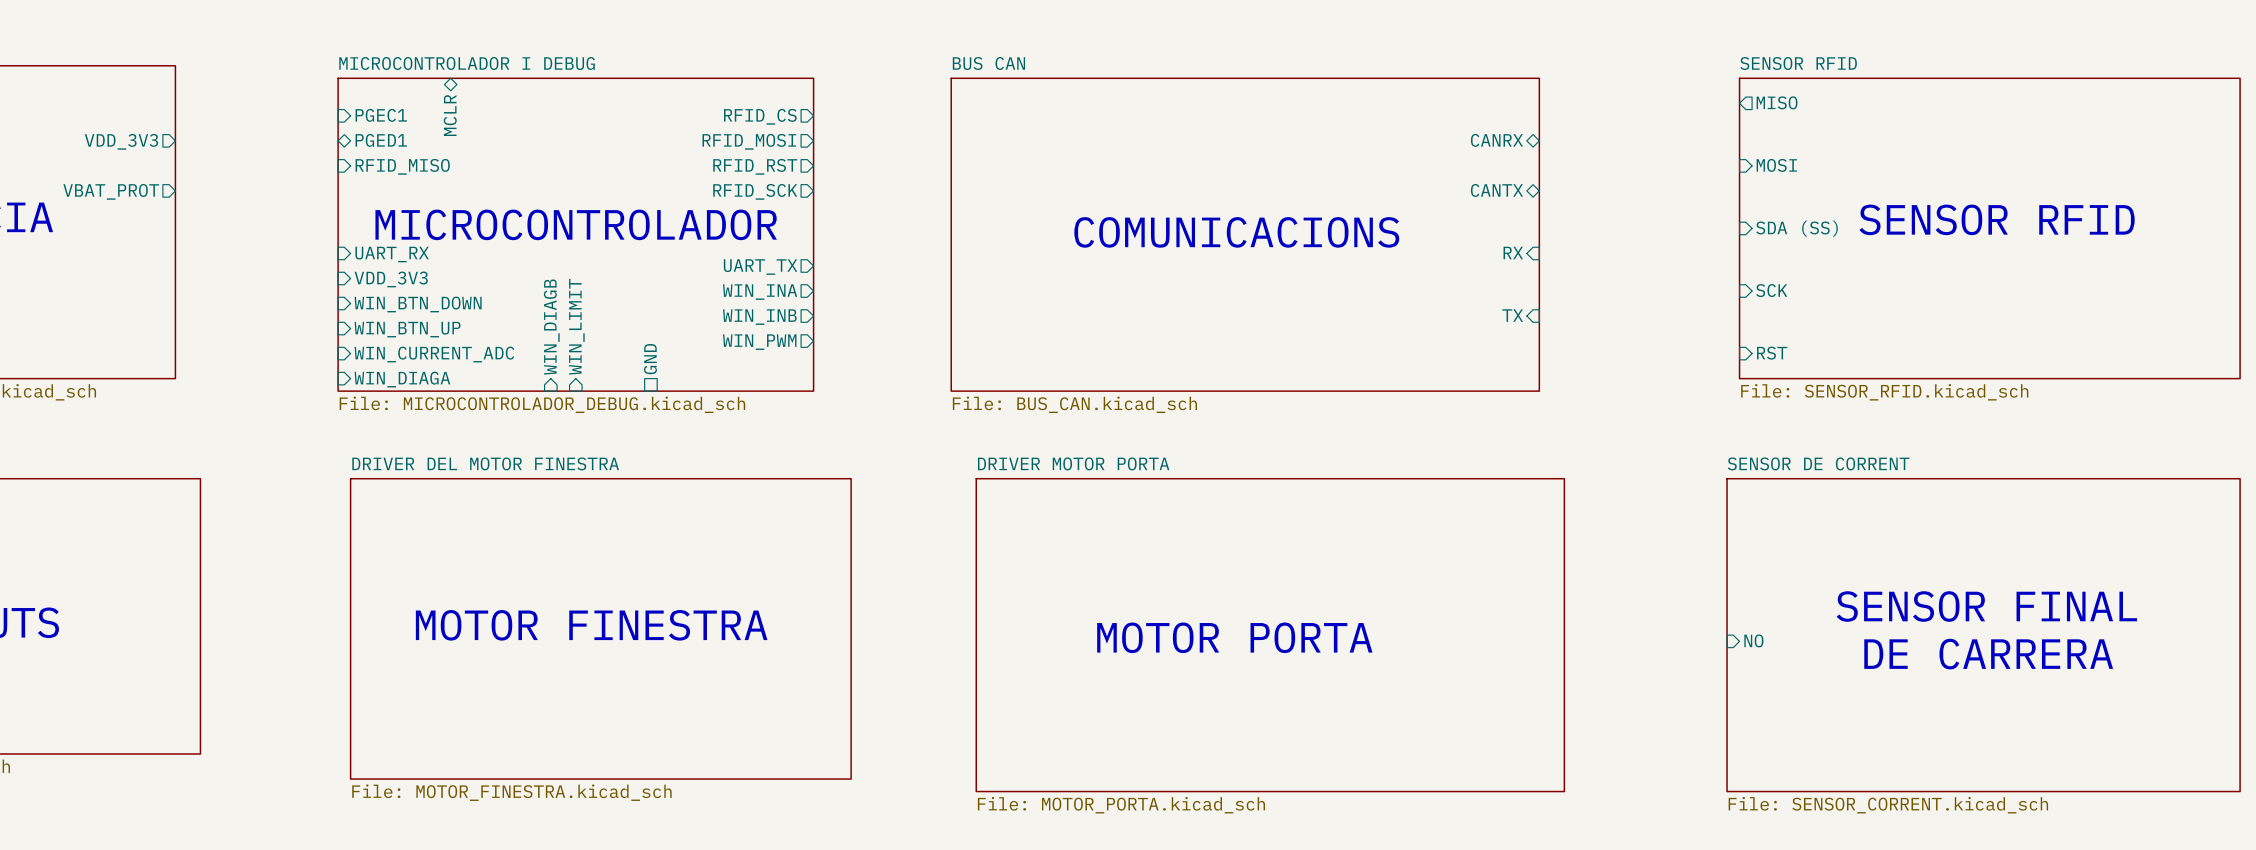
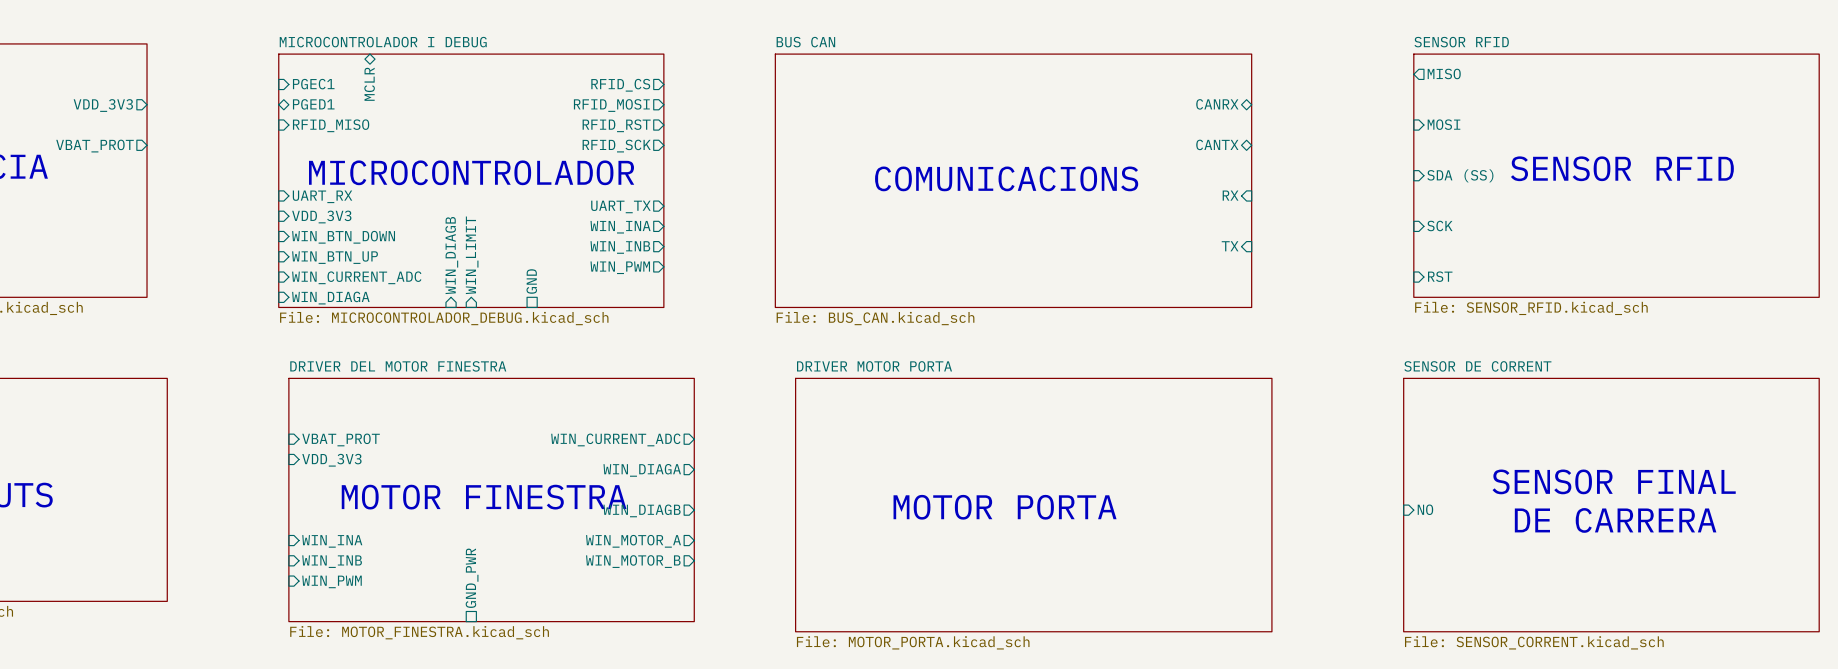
sheet pin: none -> VBAT_PROT (341, 439)
sheet pin: none -> WIN_CURRENT_ADC (615, 439)
sheet pin: none -> VDD_3V3 (331, 460)
sheet pin: none -> WIN_DIAGA (642, 470)
sheet pin: none -> WIN_DIAGB (642, 510)
sheet pin: none -> WIN_INA (332, 541)
sheet pin: none -> WIN_MOTOR_A (633, 541)
sheet pin: none -> WIN_INB (332, 561)
sheet pin: none -> WIN_MOTOR_B (633, 561)
sheet pin: none -> GND_PWR (472, 578)
sheet pin: none -> WIN_PWM (332, 581)

